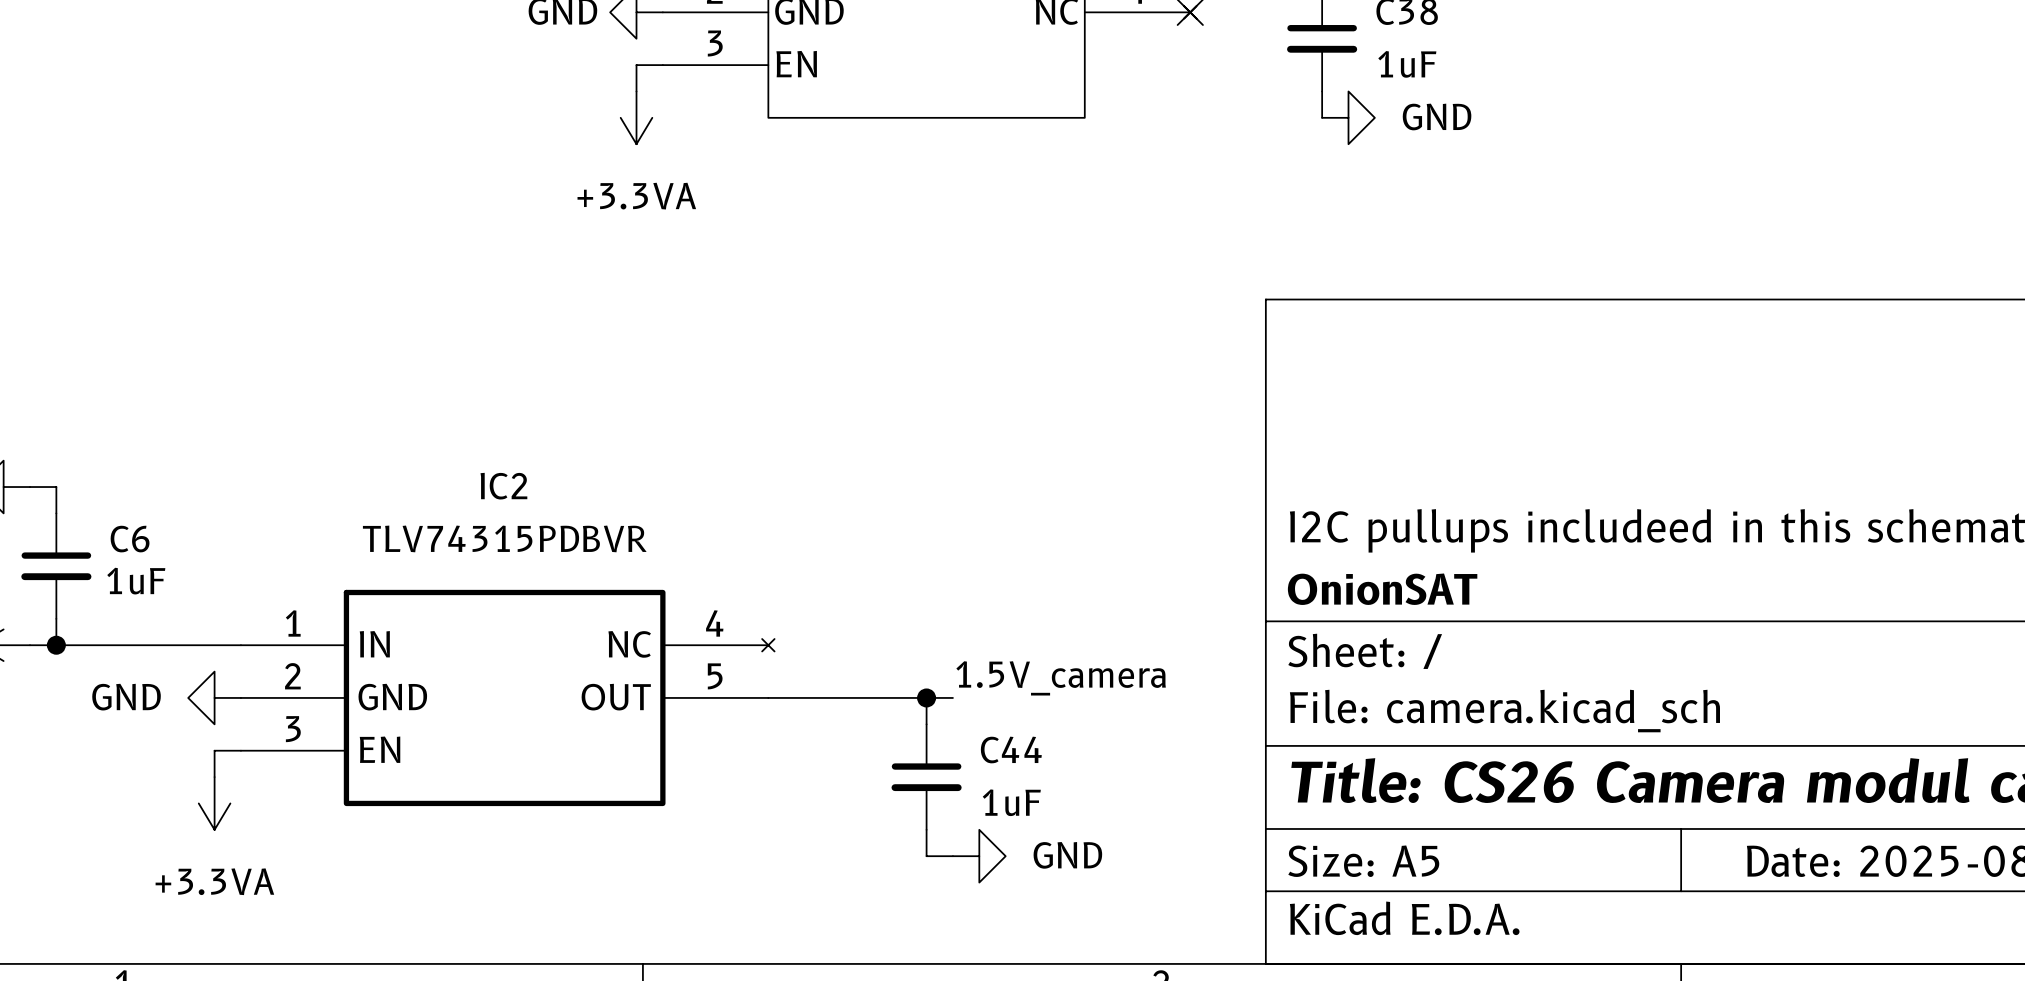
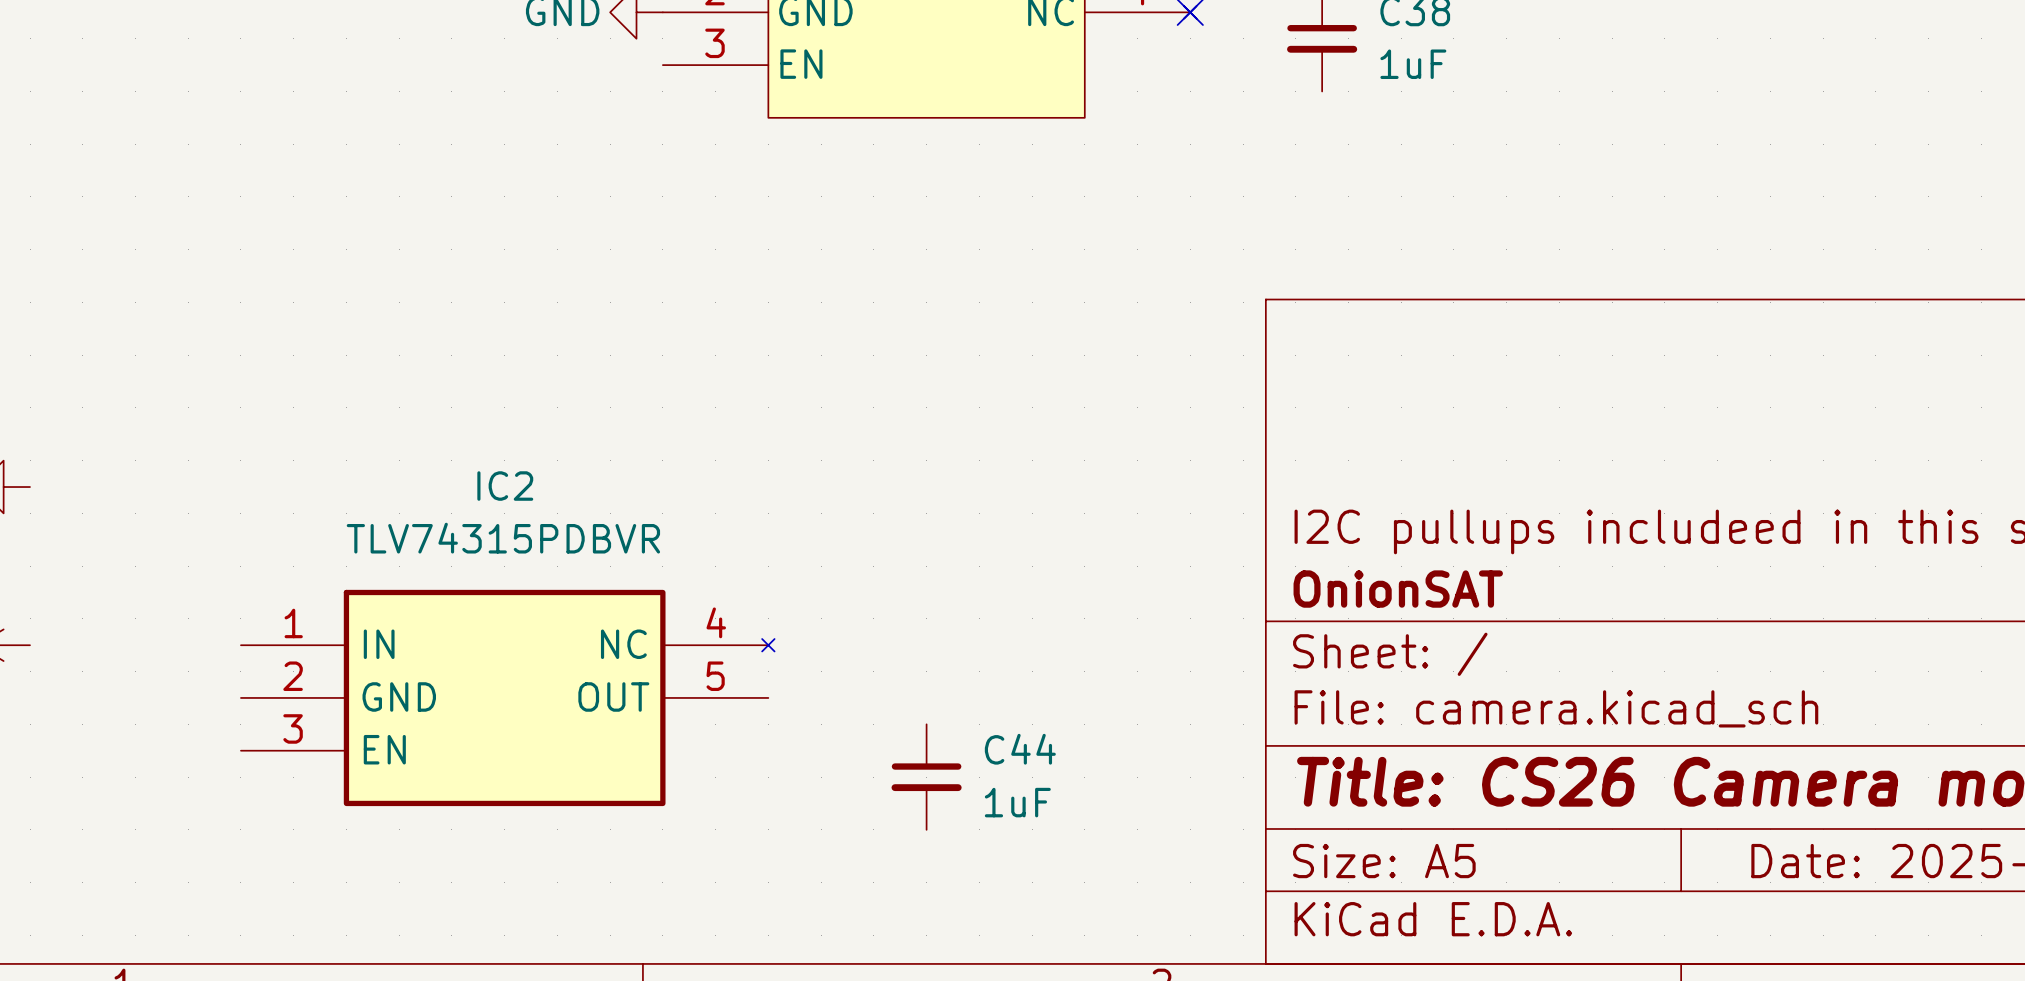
wire: (662, 65) (636, 65) (636, 91) -> none
wire: (1322, 91) (1322, 117) -> none
power symbol: +3.3VA (636, 117) -> none
power symbol: GND (1348, 117) -> none
wire: (30, 487) (56, 487) (56, 513) -> none
C6: 1uF (56, 566) -> none
wire: (56, 618) (56, 645) -> none
wire: (30, 645) (240, 645) -> none
junction: (56, 645) -> none
label: 1.5V_camera (1061, 678) -> none
power symbol: GND (214, 697) -> none
wire: (768, 697) (952, 697) -> none
wire: (926, 697) (926, 724) -> none
junction: (926, 697) -> none
wire: (240, 750) (214, 750) (214, 777) -> none
power symbol: +3.3VA (214, 803) -> none
wire: (926, 829) (926, 856) (952, 856) -> none
power symbol: GND (979, 856) -> none

